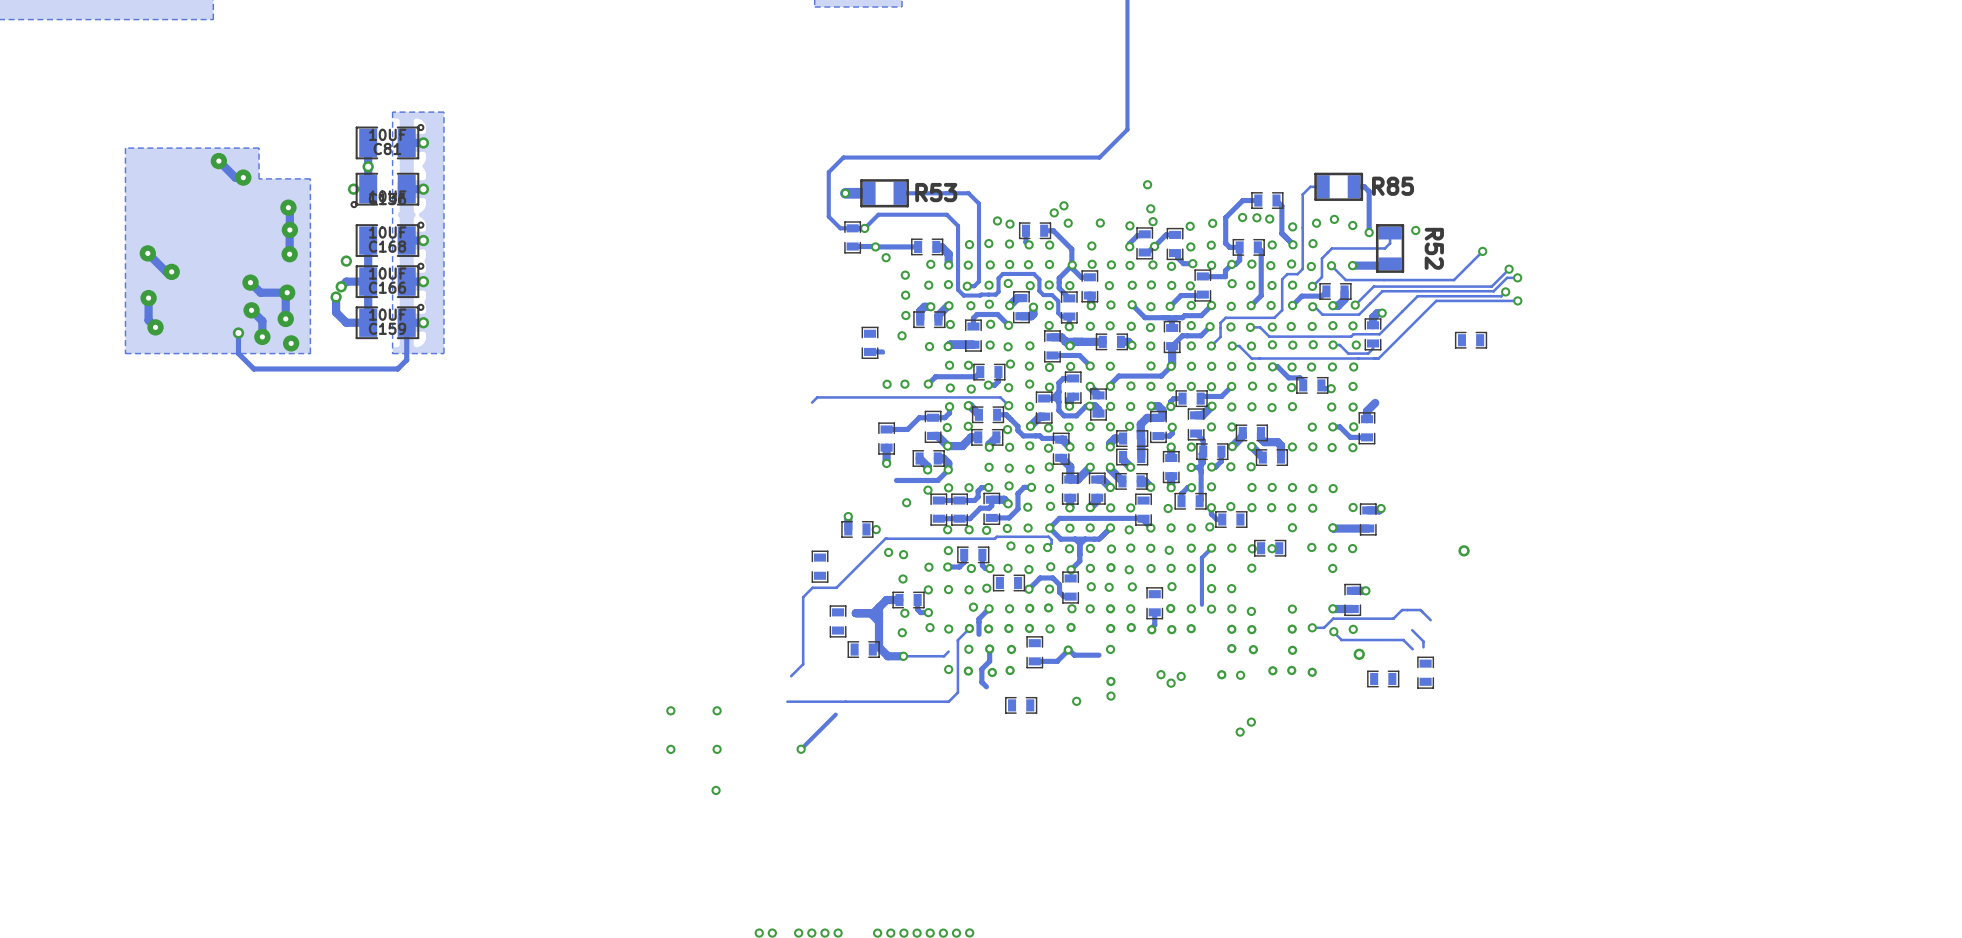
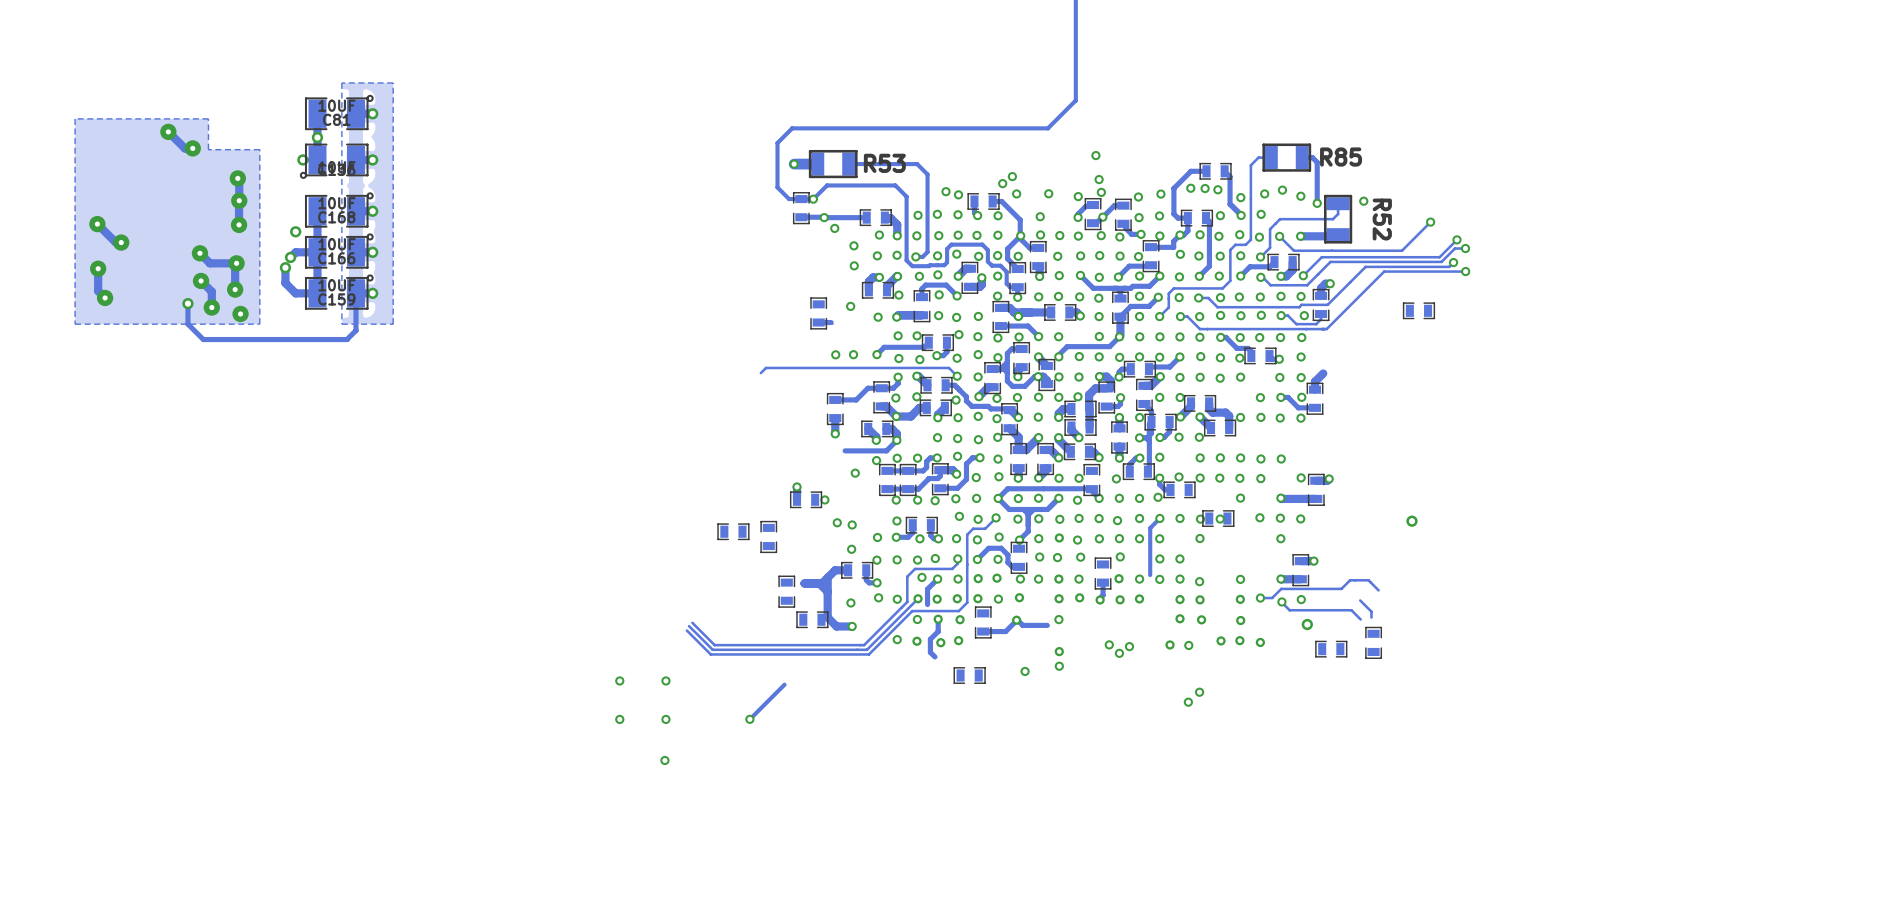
via: (905, 315) -> none
track: (1047, 547) (1051, 543) (1051, 539) (1048, 536) (885, 538) (836, 587) (812, 587) (803, 597) (803, 664) (791, 676) -> (996, 517) (985, 528) (973, 528) (967, 534) (967, 602) (958, 611) (912, 611) (868, 654) (710, 654) (686, 630)
part position: (1008, 583) -> (733, 531)
track: none -> (957, 558) (957, 563) (952, 568) (915, 568) (907, 576) (907, 601) (864, 645) (714, 645) (692, 622)
via position: (904, 613) -> (957, 558)
track: (957, 640) (957, 692) (948, 701) (787, 701) -> (906, 610) (866, 649) (712, 649) (689, 626)
track: (948, 651) (944, 656) (903, 656) -> none

